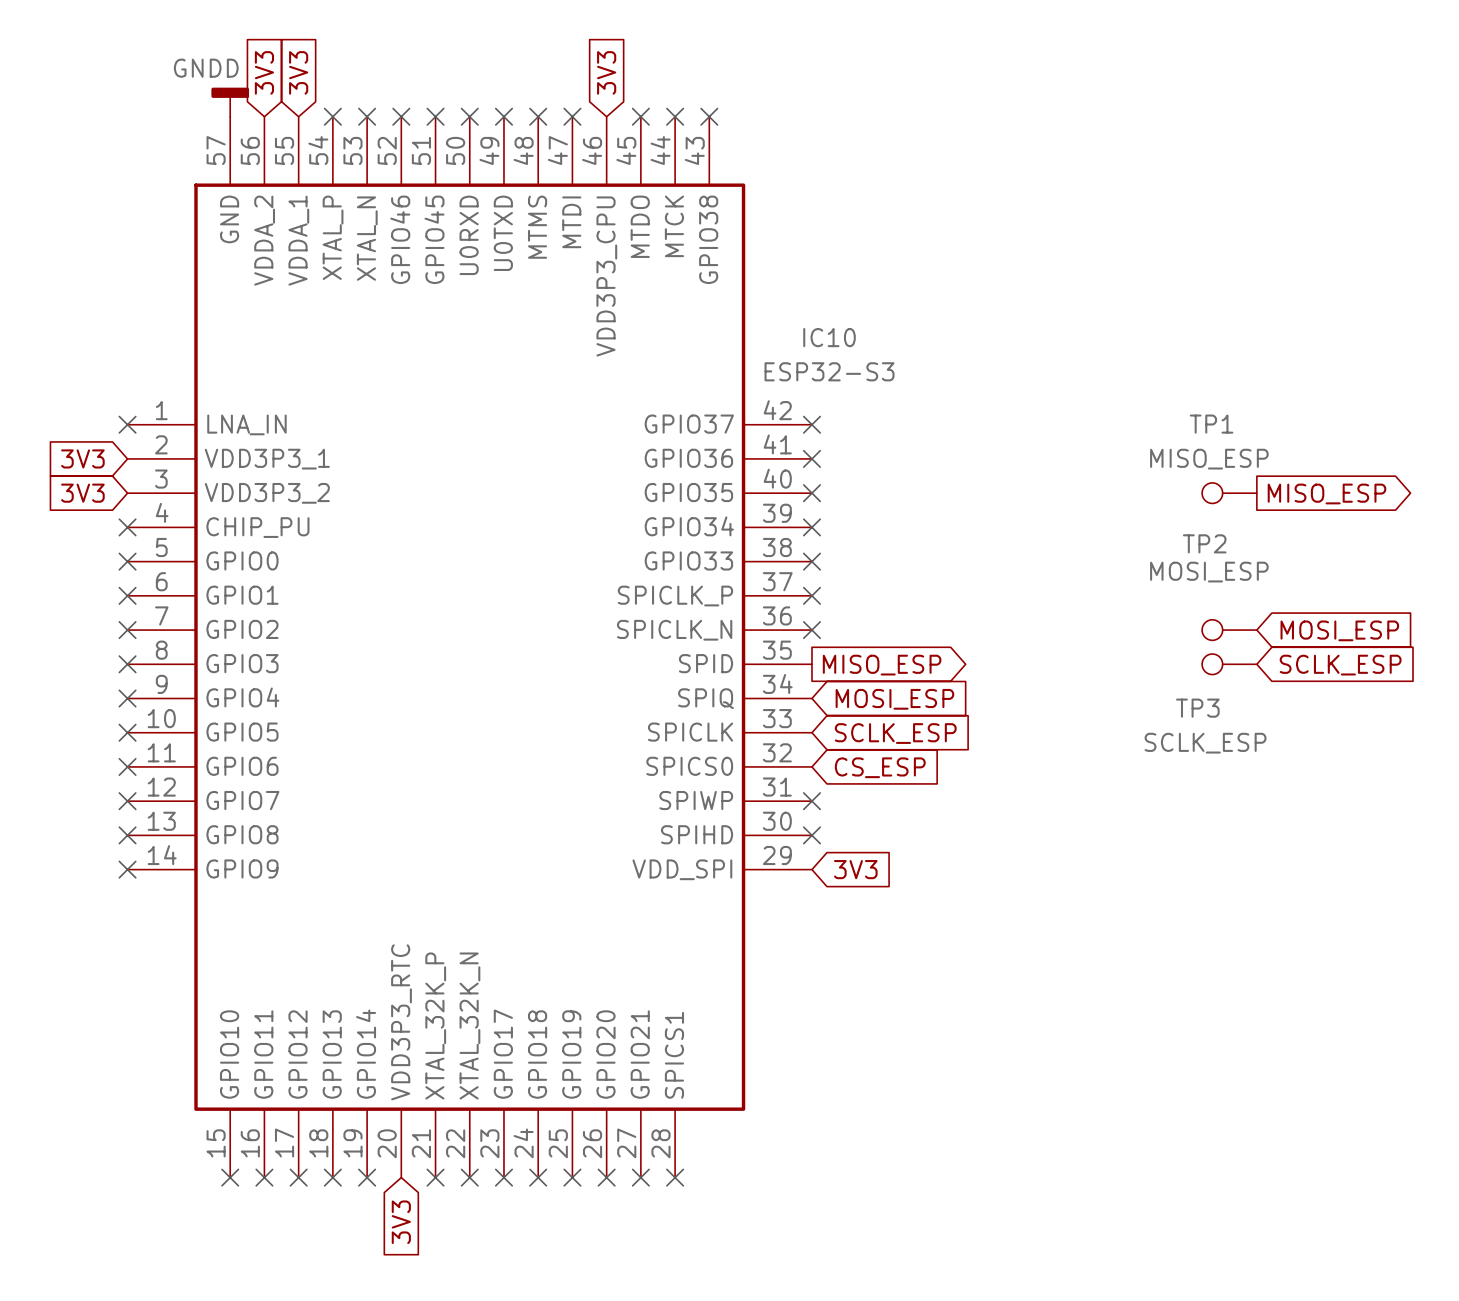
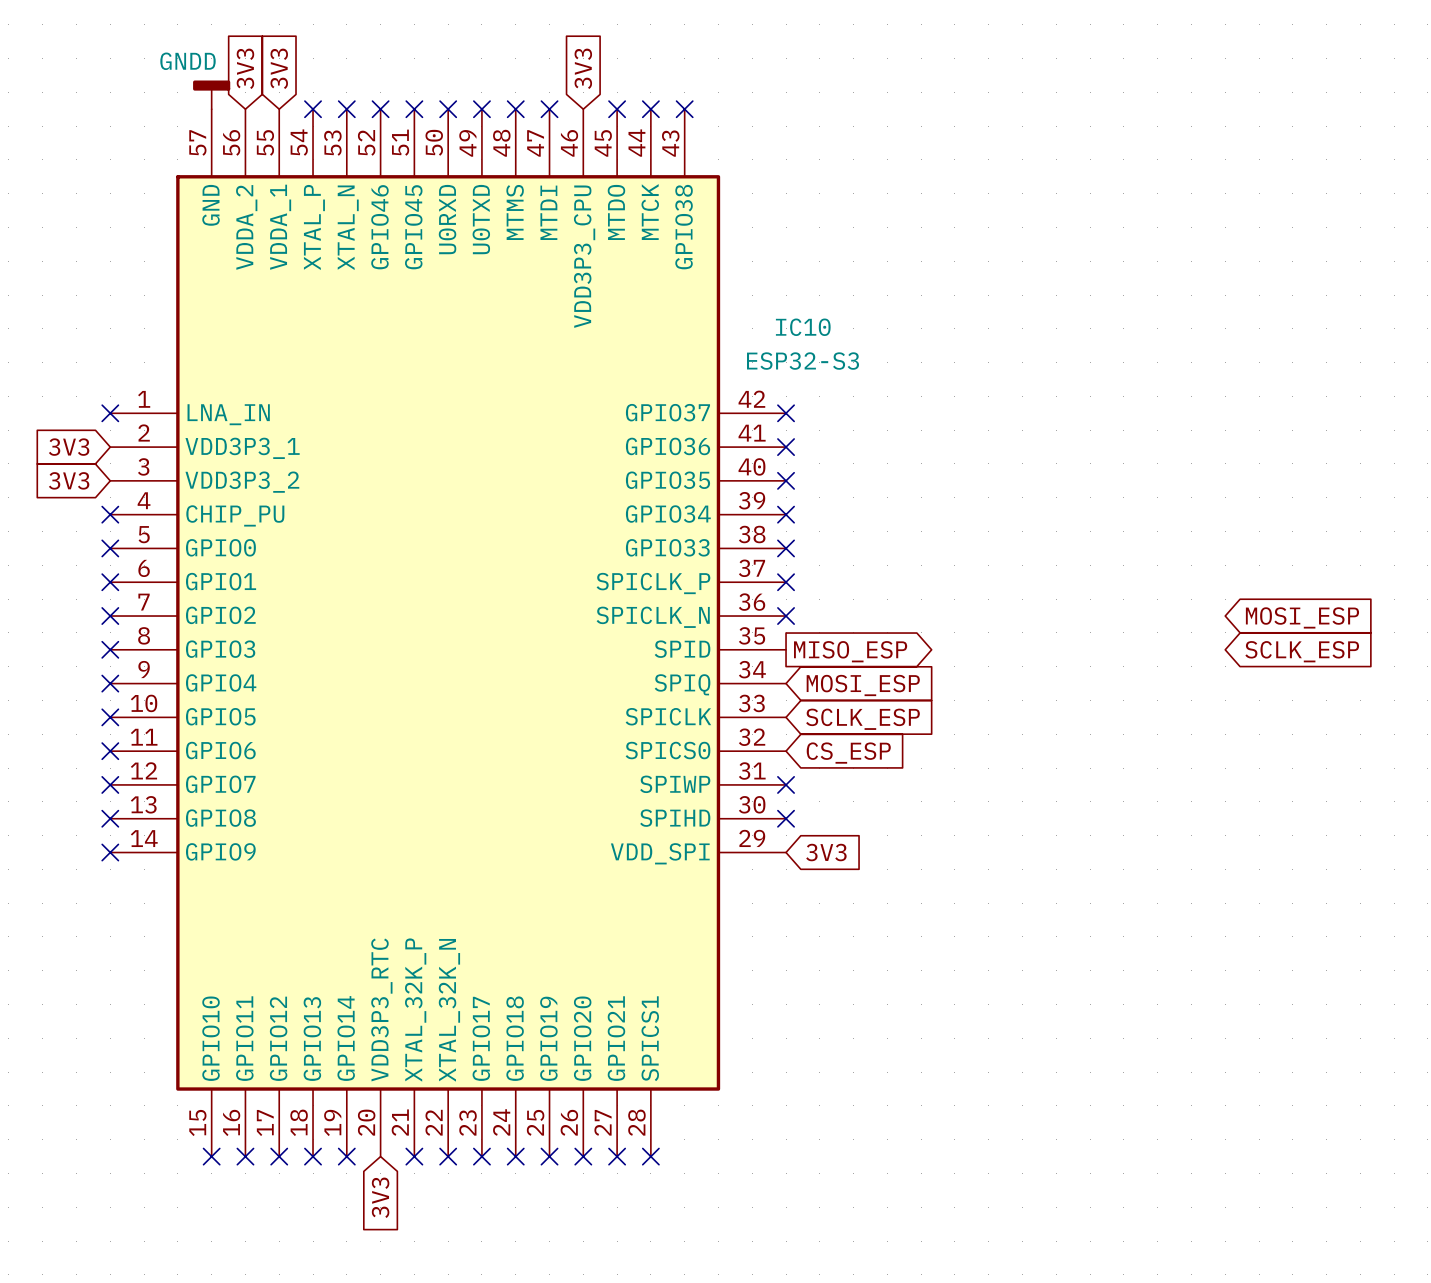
TP1: MISO_ESP (1229, 493) -> none
global label: MISO_ESP (1326, 493) -> none
TP2: MOSI_ESP (1229, 630) -> none
TP3: SCLK_ESP (1229, 664) -> none

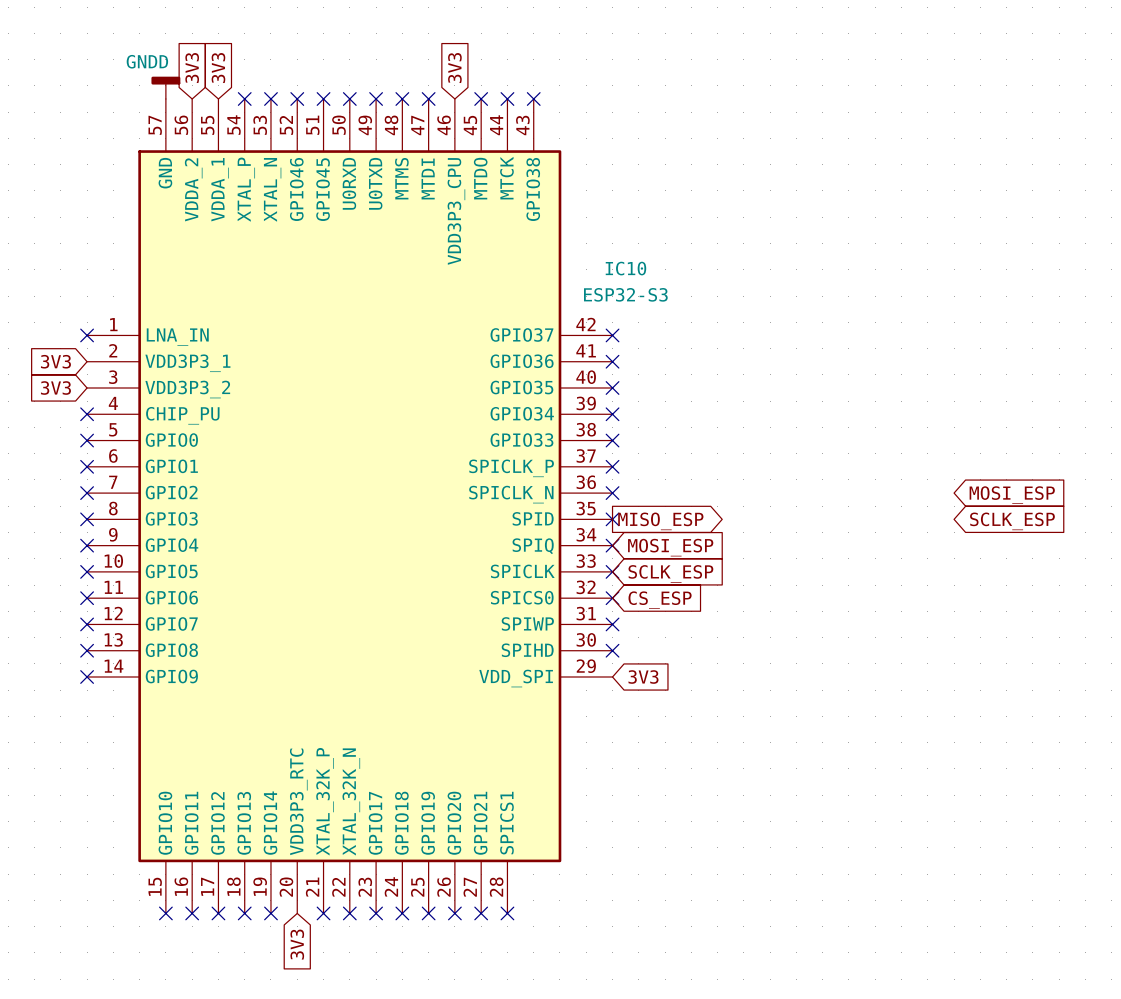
no-connect mark: none -> (612, 519)
no-connect mark: none -> (612, 545)
no-connect mark: none -> (612, 571)
no-connect mark: none -> (612, 598)

